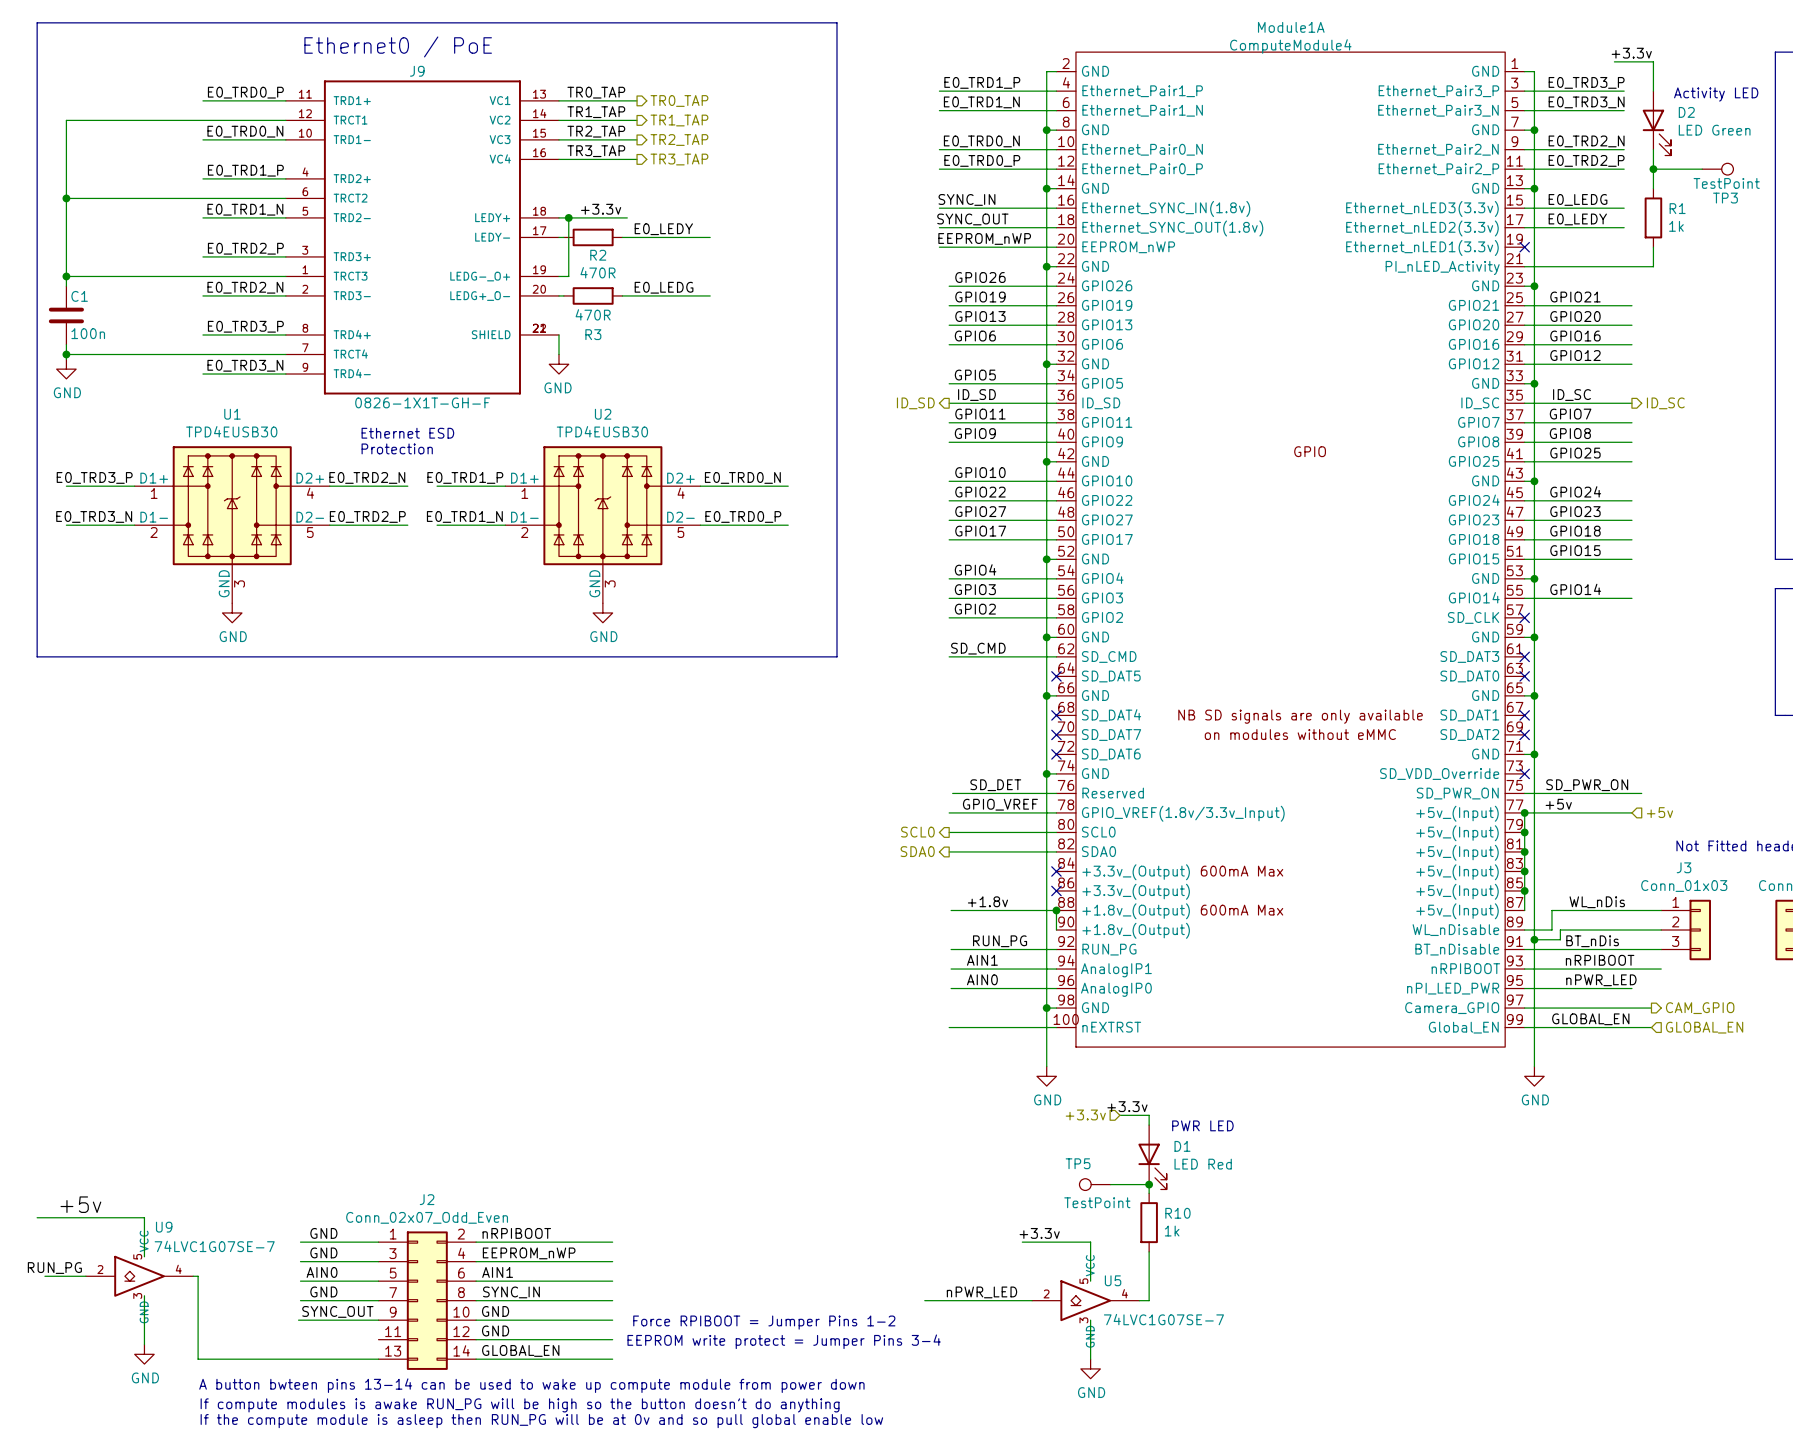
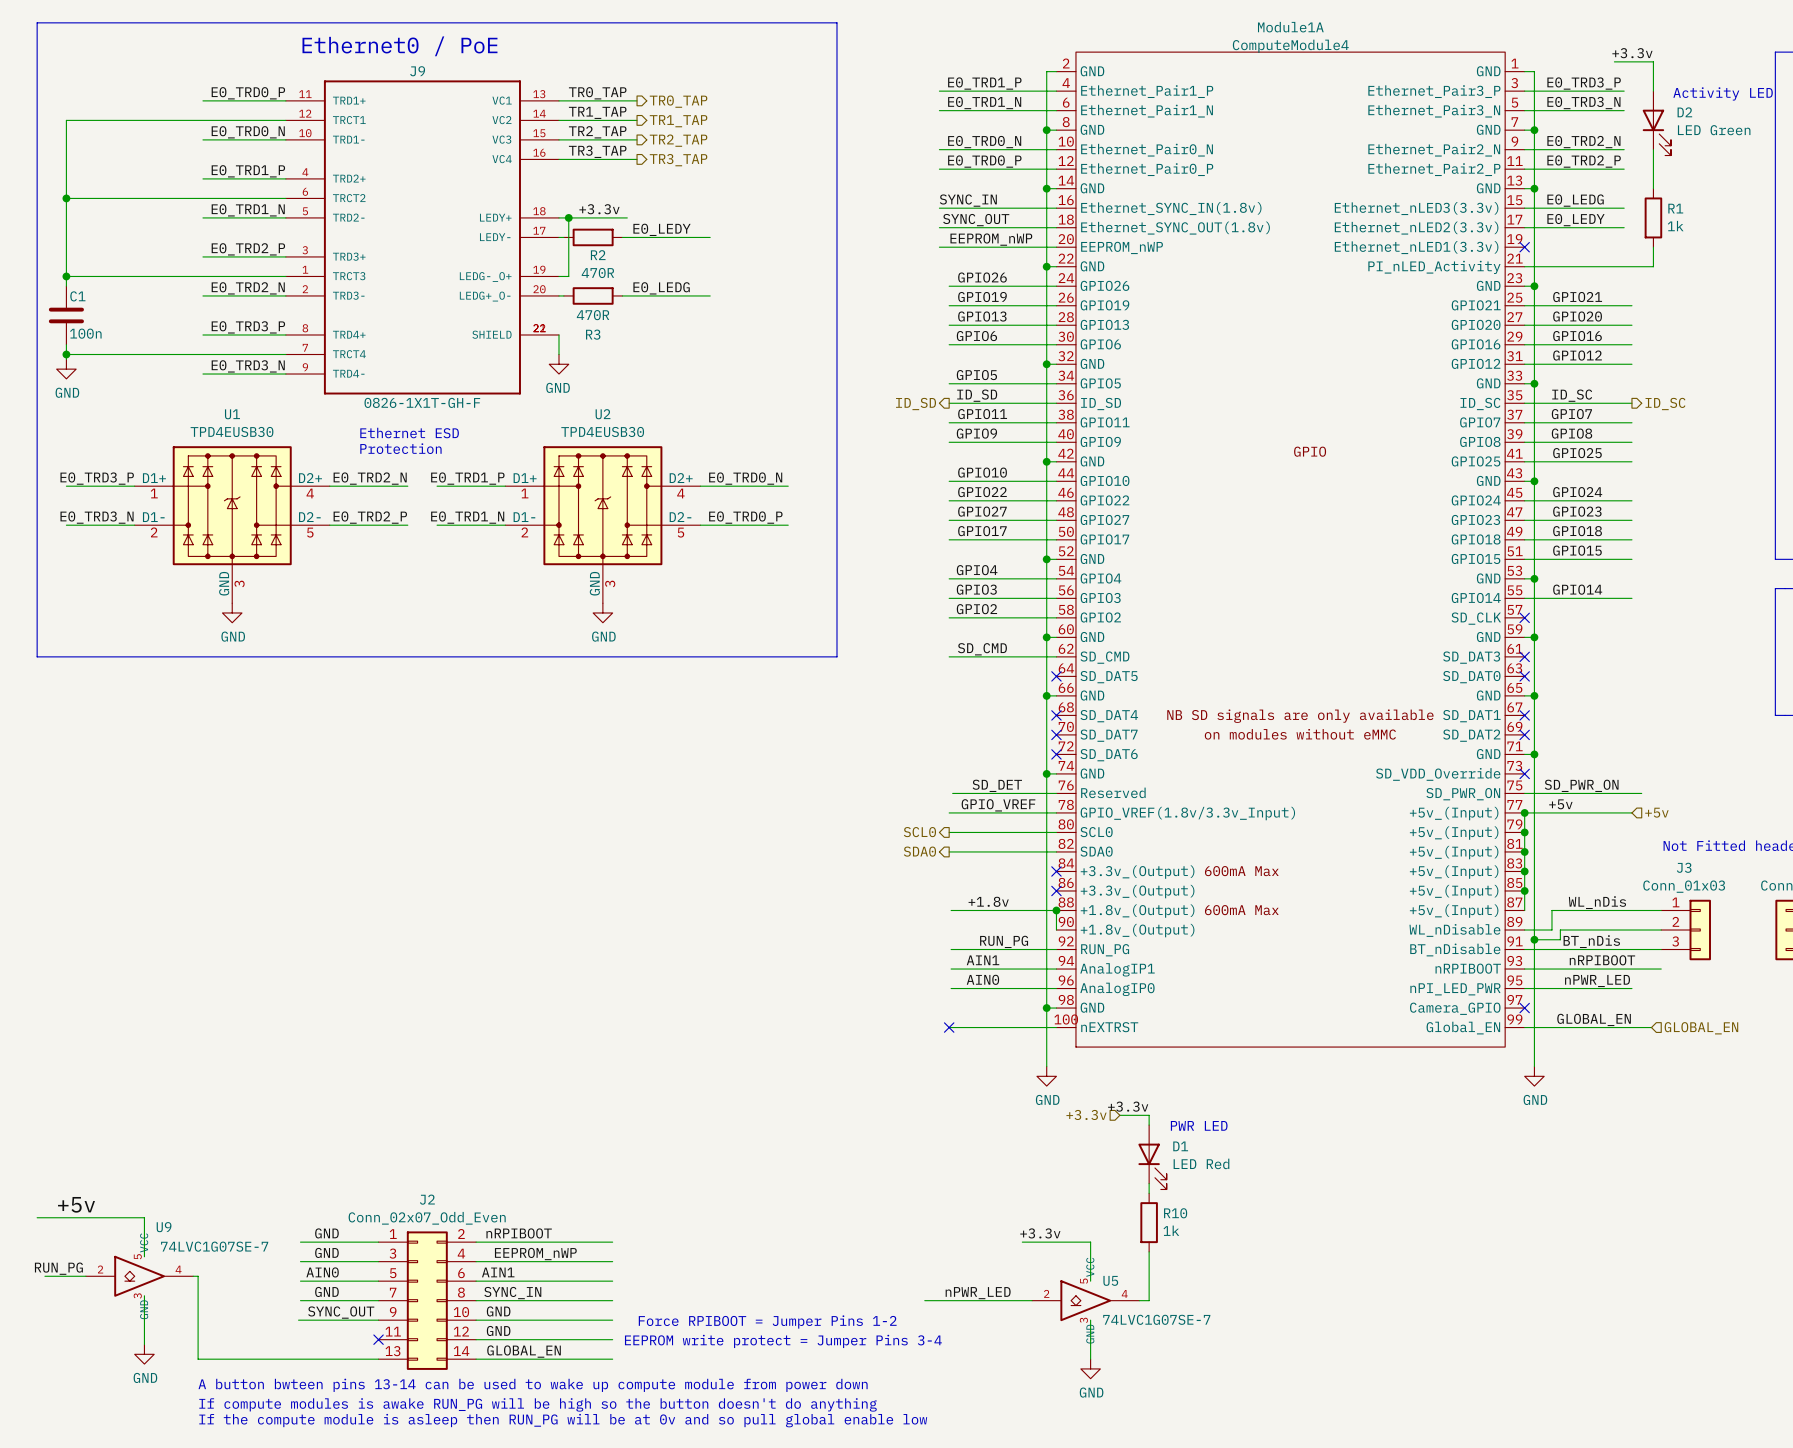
wire: (1653, 169) (1702, 169) -> none
junction: (1653, 169) -> none
TP3: TestPoint (1717, 169) -> none
wire: (1524, 1008) (1651, 1008) -> none
no-connect mark: none -> (1524, 1008)
hierarchical label: CAM_GPIO (1700, 1008) -> none
no-connect mark: none -> (949, 1027)
TP5: TestPoint (1095, 1184) -> none
wire: (1110, 1184) (1149, 1184) -> none
junction: (1149, 1184) -> none
no-connect mark: none -> (378, 1339)

